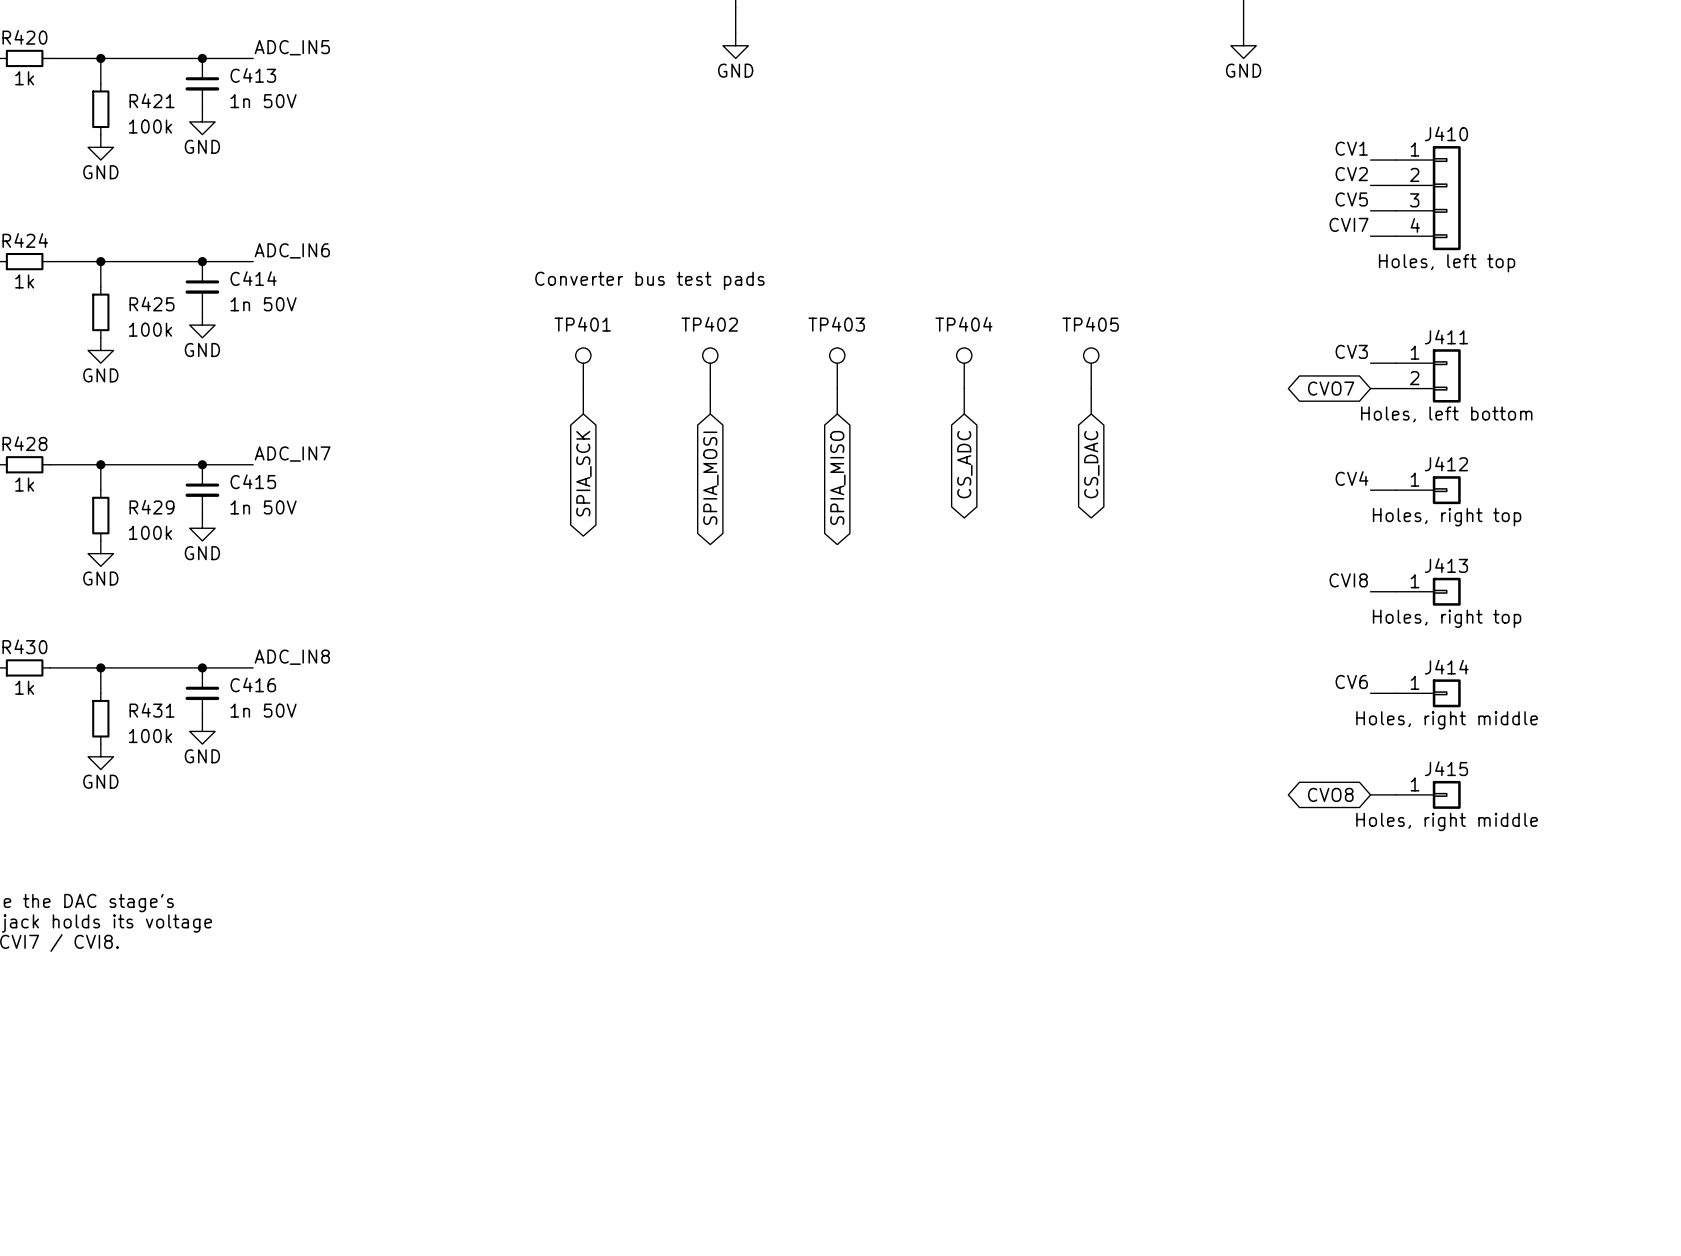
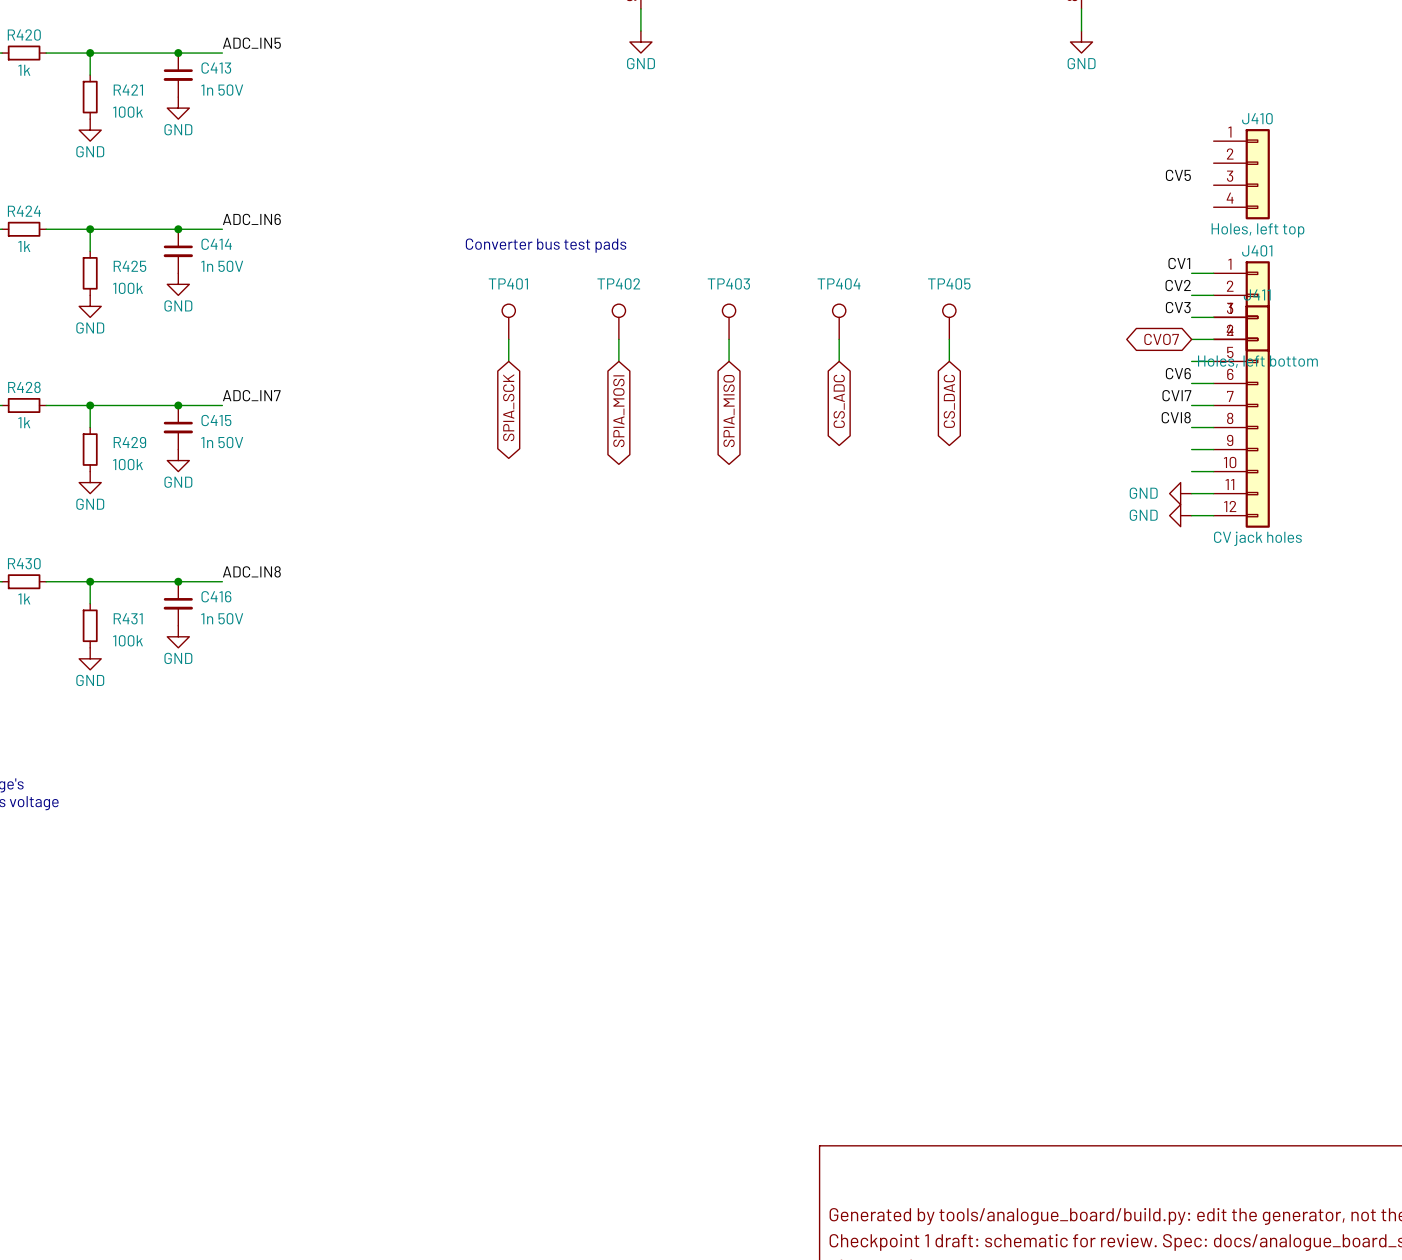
label position: CV1 (1351, 148) -> CV1 (1179, 263)
wire: (1370, 160) (1395, 160) -> (1191, 273) (1213, 273)
label position: CV2 (1351, 174) -> CV2 (1178, 285)
wire: (1370, 185) (1395, 185) -> (1191, 361) (1213, 361)
wire: (1370, 210) (1395, 210) -> (1191, 383) (1213, 383)
label position: CVI7 (1349, 224) -> CVI7 (1176, 395)
wire: (1370, 236) (1395, 236) -> (1191, 405) (1213, 405)
wire: none -> (1191, 295) (1213, 295)
label: none -> CV6 (1178, 373)
J401: none -> CV jack holes (1241, 394)
label: CV4 (1352, 478) -> CVI8 (1176, 417)
J412: Holes, right top (1428, 490) -> none
wire: none -> (1191, 449) (1213, 449)
power symbol: none -> GND (1180, 493)
label: CVI8 (1348, 580) -> none
power symbol: none -> GND (1180, 515)
J413: Holes, right top (1428, 591) -> none
label: CV6 (1351, 681) -> none
wire: (1370, 693) (1395, 693) -> (1191, 471) (1213, 471)
J414: Holes, right middle (1428, 693) -> none
global label: CVO8 (1330, 794) -> none
wire: (1370, 794) (1395, 794) -> (1191, 493) (1213, 493)
J415: Holes, right middle (1428, 794) -> none

